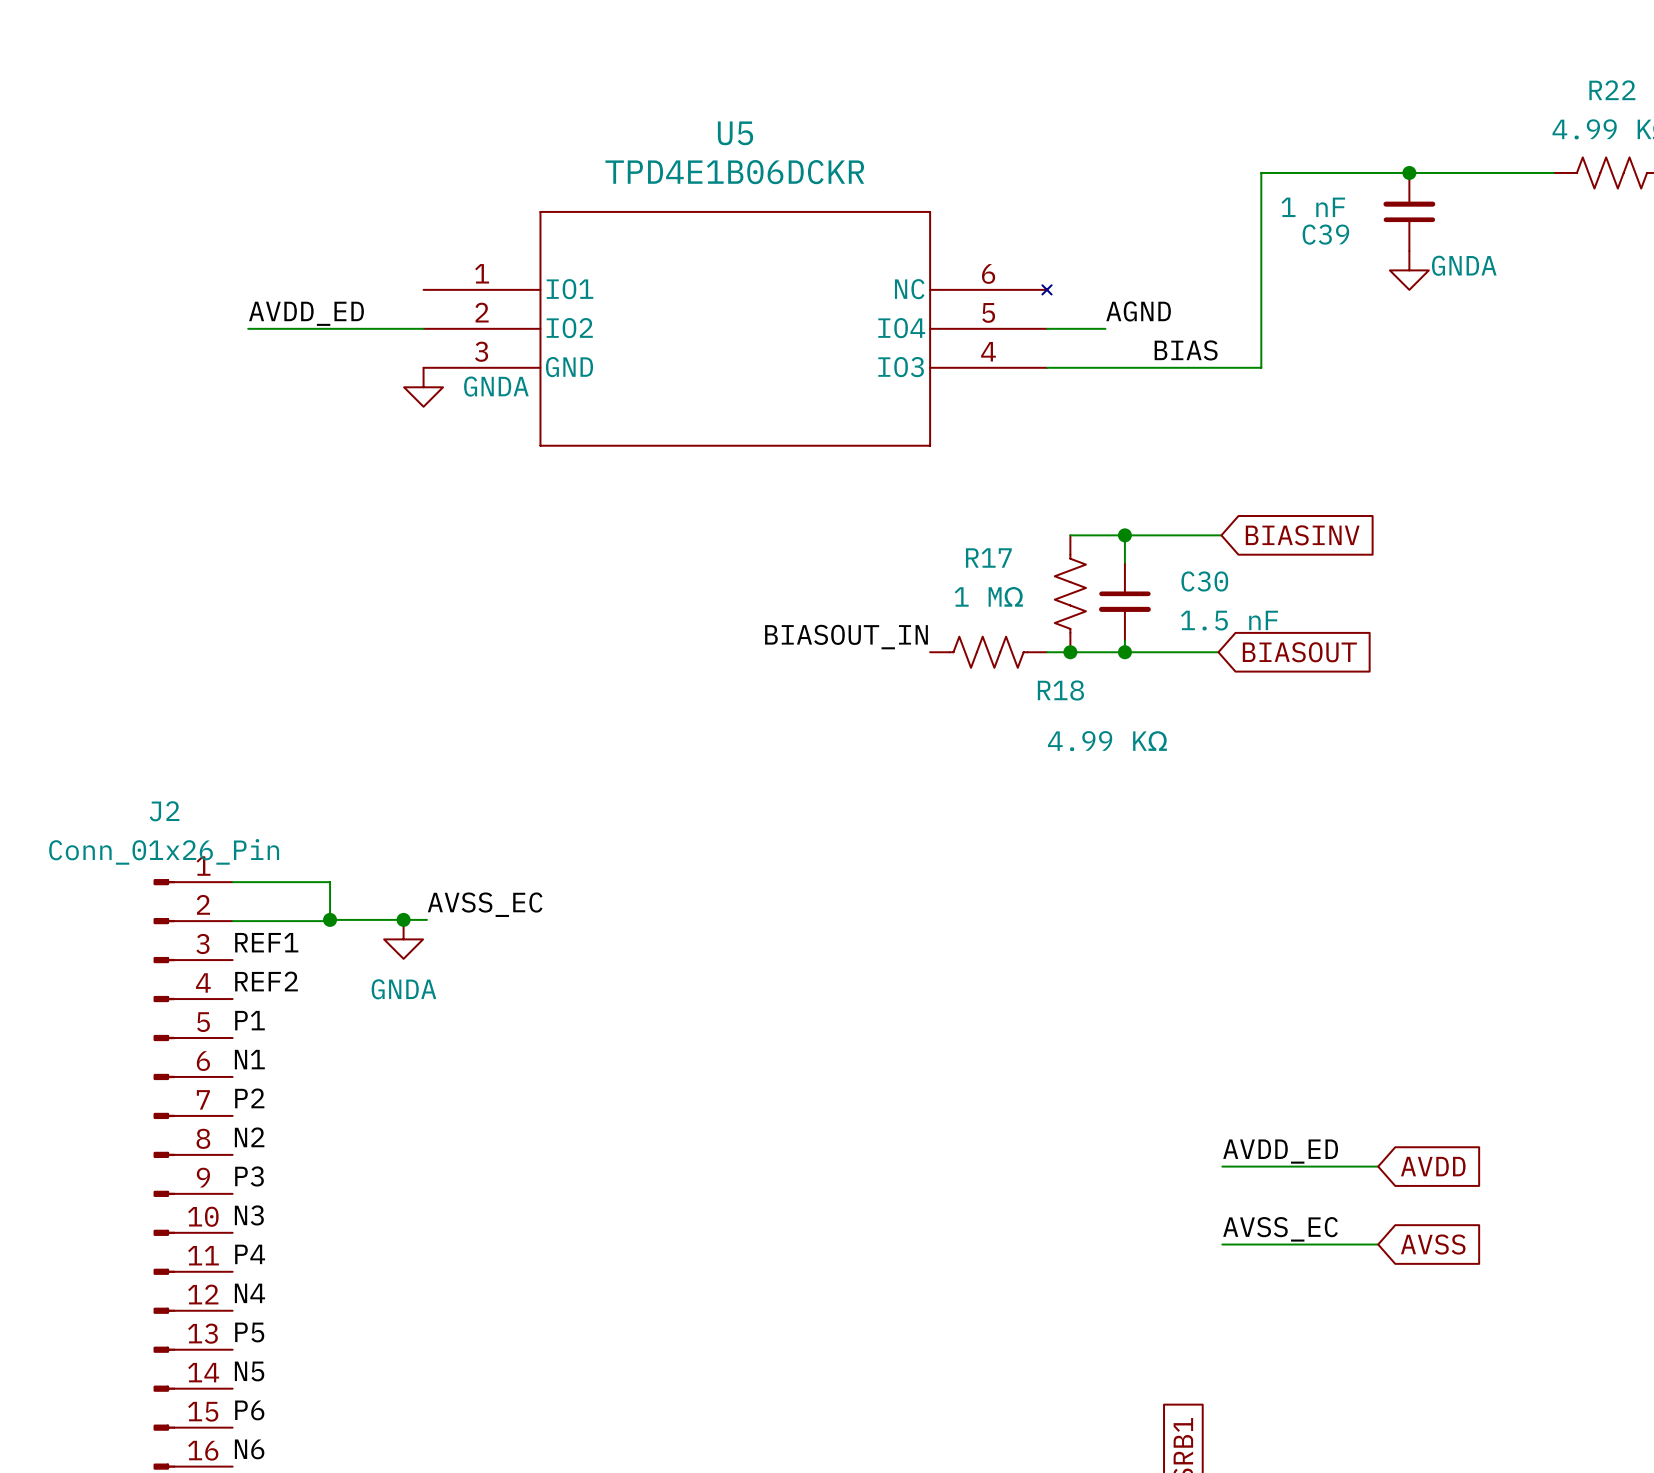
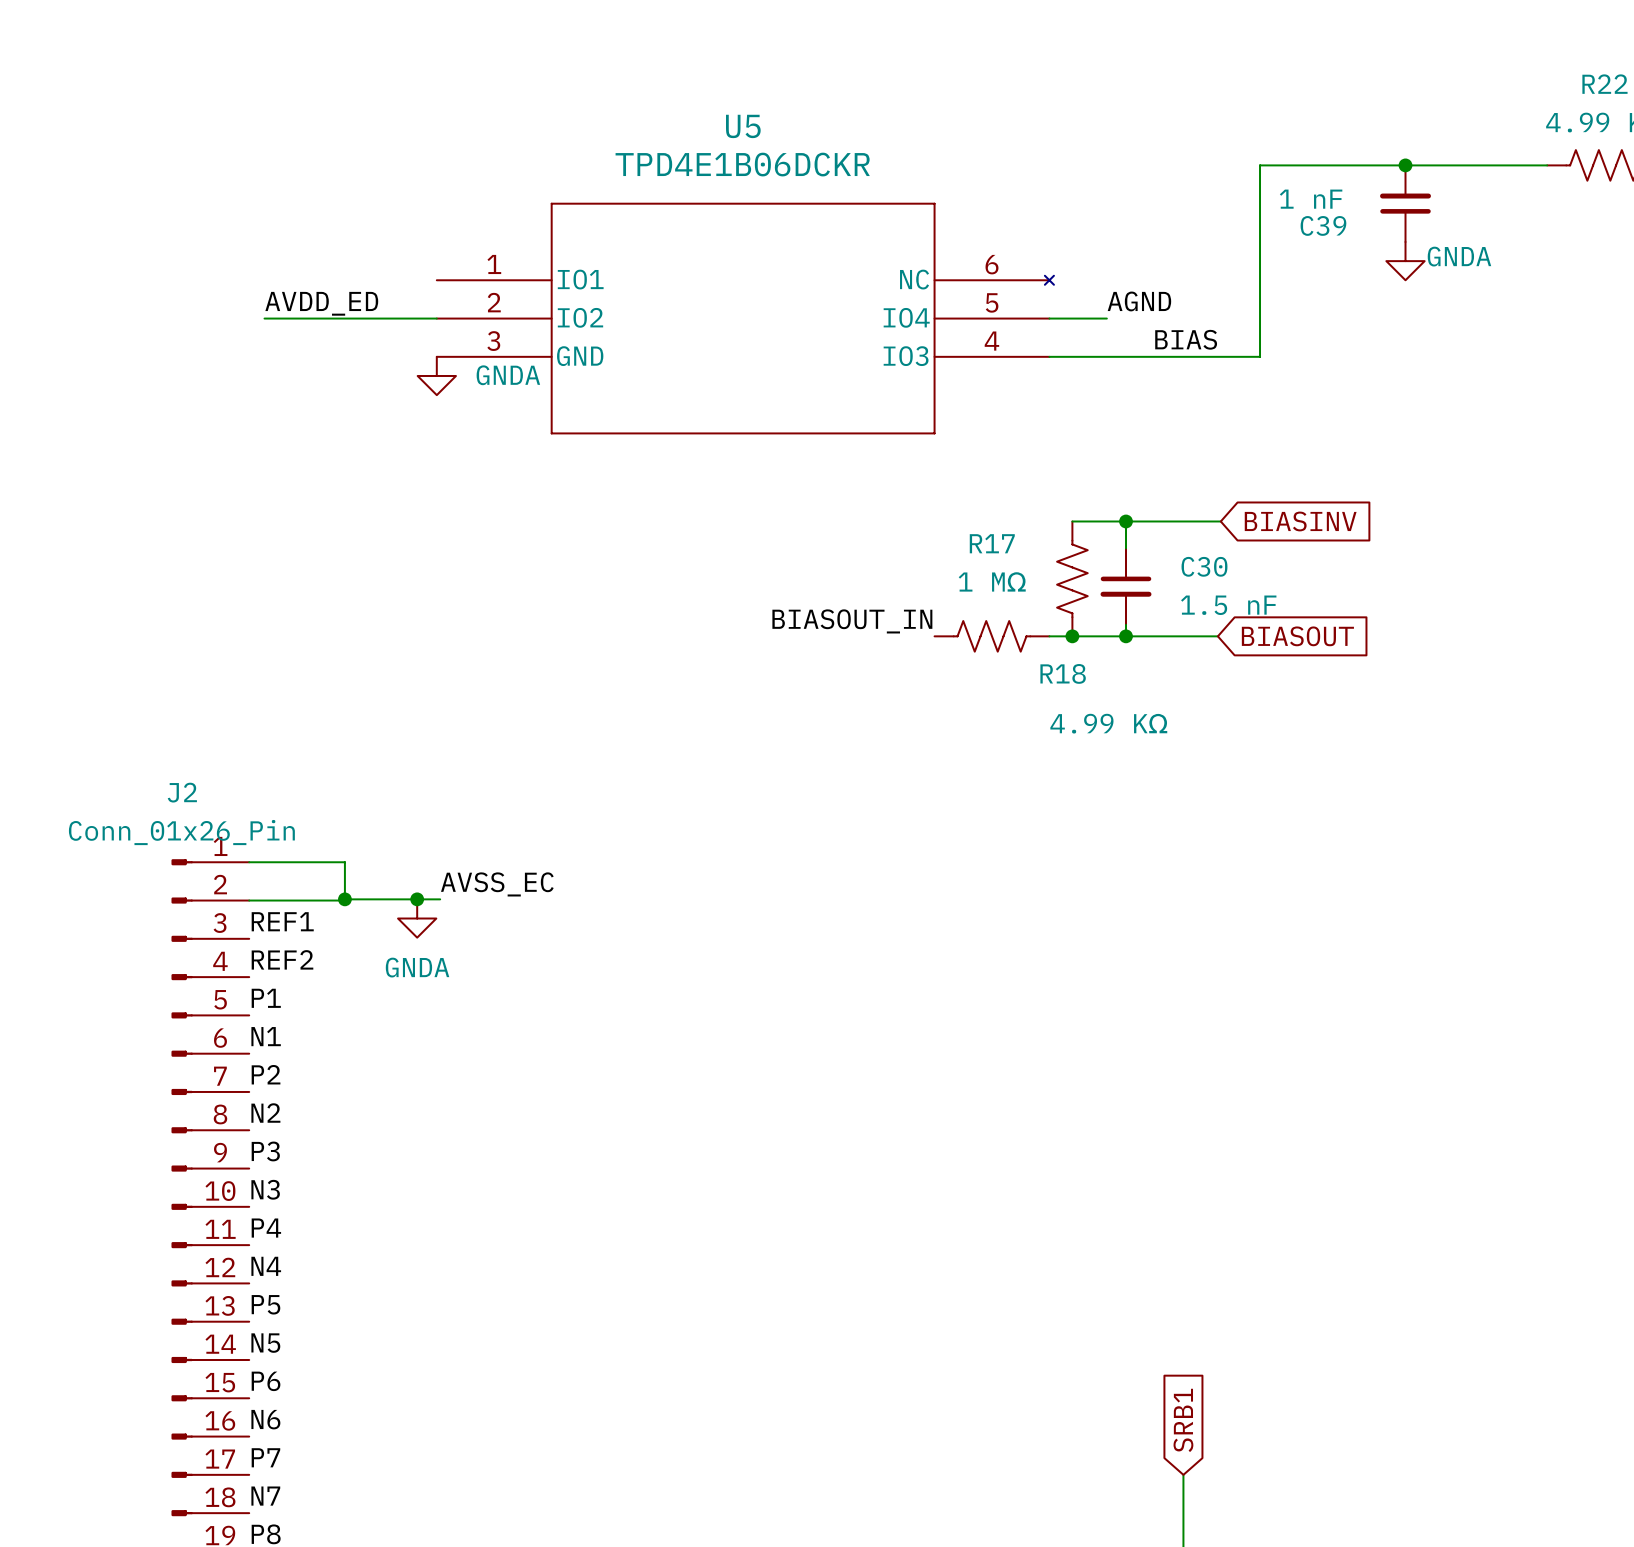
label: AVDD_ED (1280, 1151) -> none
wire: (1222, 1166) (1378, 1166) -> none
global label: AVDD (1433, 1166) -> none
label: AVSS_EC (1280, 1229) -> none
wire: (1222, 1244) (1378, 1244) -> none
global label: AVSS (1433, 1244) -> none

